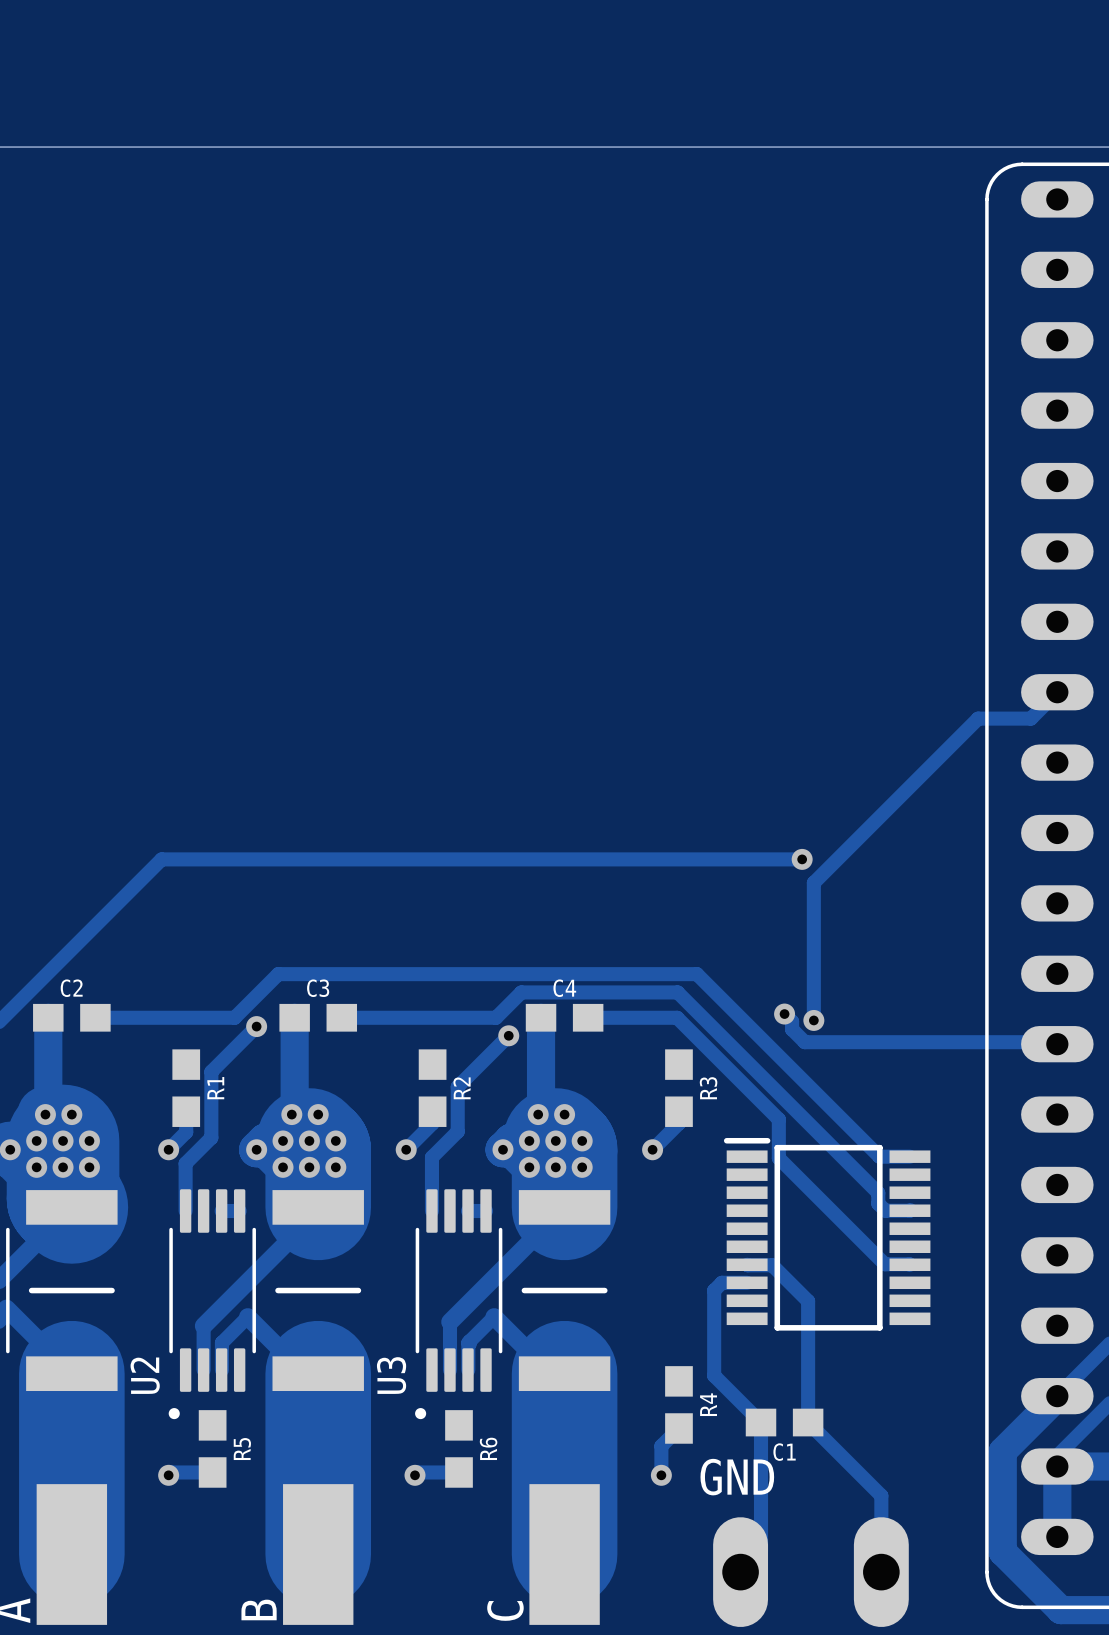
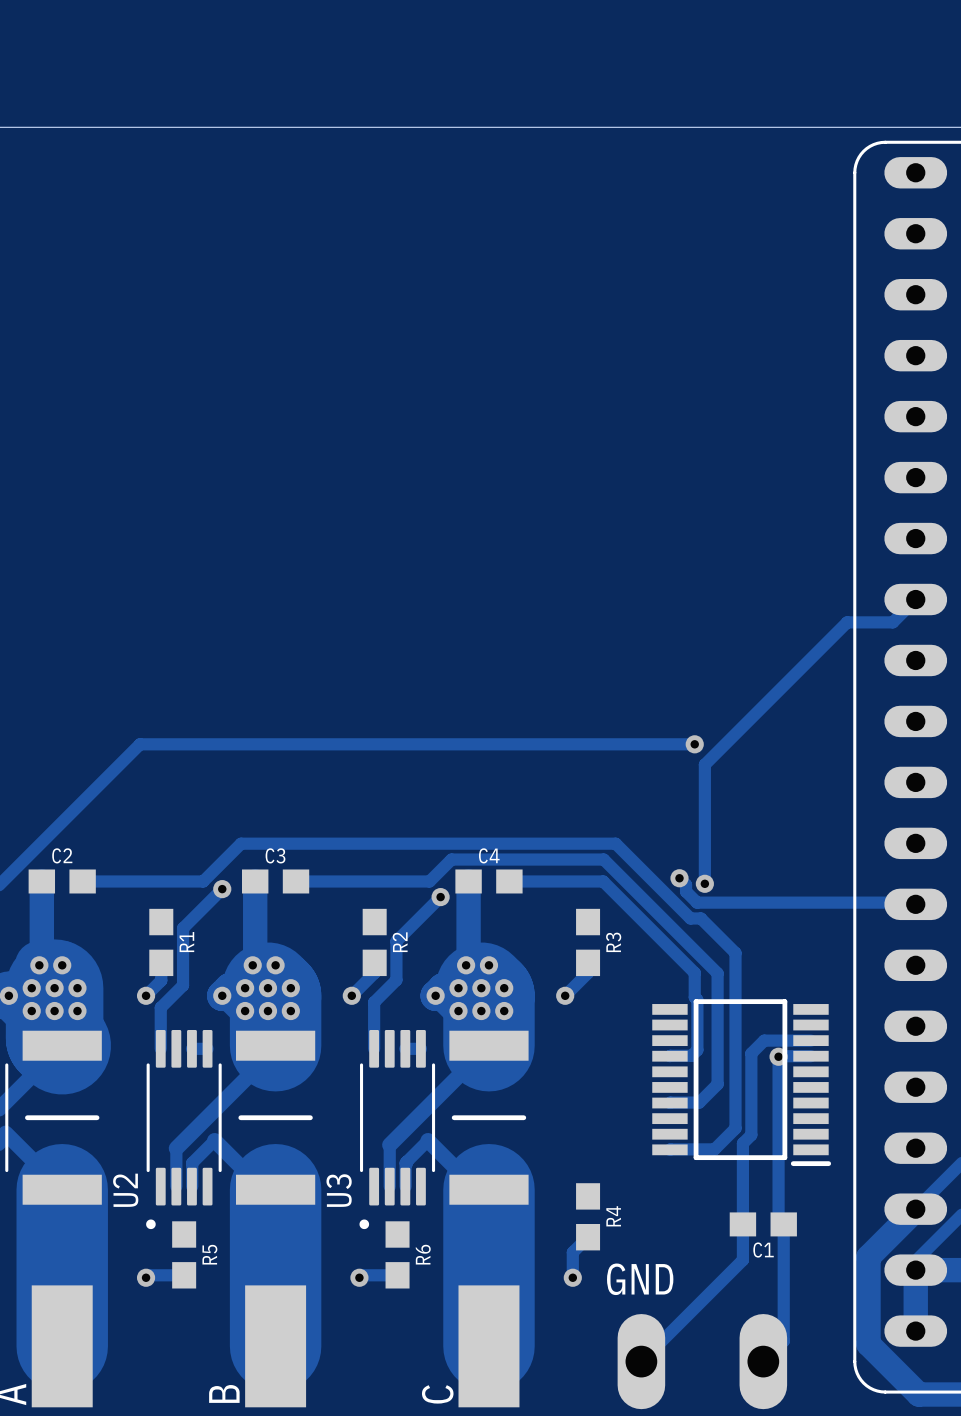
track: (696, 974) (879, 1156) (909, 1156) -> (603, 843) (615, 843) (690, 918) (700, 918) (735, 953) (735, 1128) (714, 1149) (669, 1149)
track: (677, 992) (878, 1193) (878, 1203) (885, 1210) (910, 1210) -> (586, 859) (603, 859) (717, 973) (717, 1084) (699, 1102) (669, 1103)
track: (677, 1017) (778, 1119) (778, 1158) (884, 1264) (909, 1264) -> (586, 881) (603, 881) (694, 972) (694, 997) (697, 999) (697, 1050) (691, 1055) (669, 1056)
via: none -> (778, 1056)
part rotation: 0° (827, 1234) -> 180° (741, 1082)
track: (747, 1264) (772, 1265) (808, 1301) (808, 1422) (881, 1495) (881, 1572) -> (810, 1056) (778, 1056) (778, 1219) (783, 1224) (783, 1341) (763, 1361)
track: (747, 1282) (721, 1282) (714, 1290) (714, 1375) (761, 1422) (761, 1551) -> (810, 1040) (764, 1040) (751, 1053) (751, 1134) (742, 1143) (742, 1260) (659, 1343)
C1 position: (784, 1422) -> (763, 1224)

